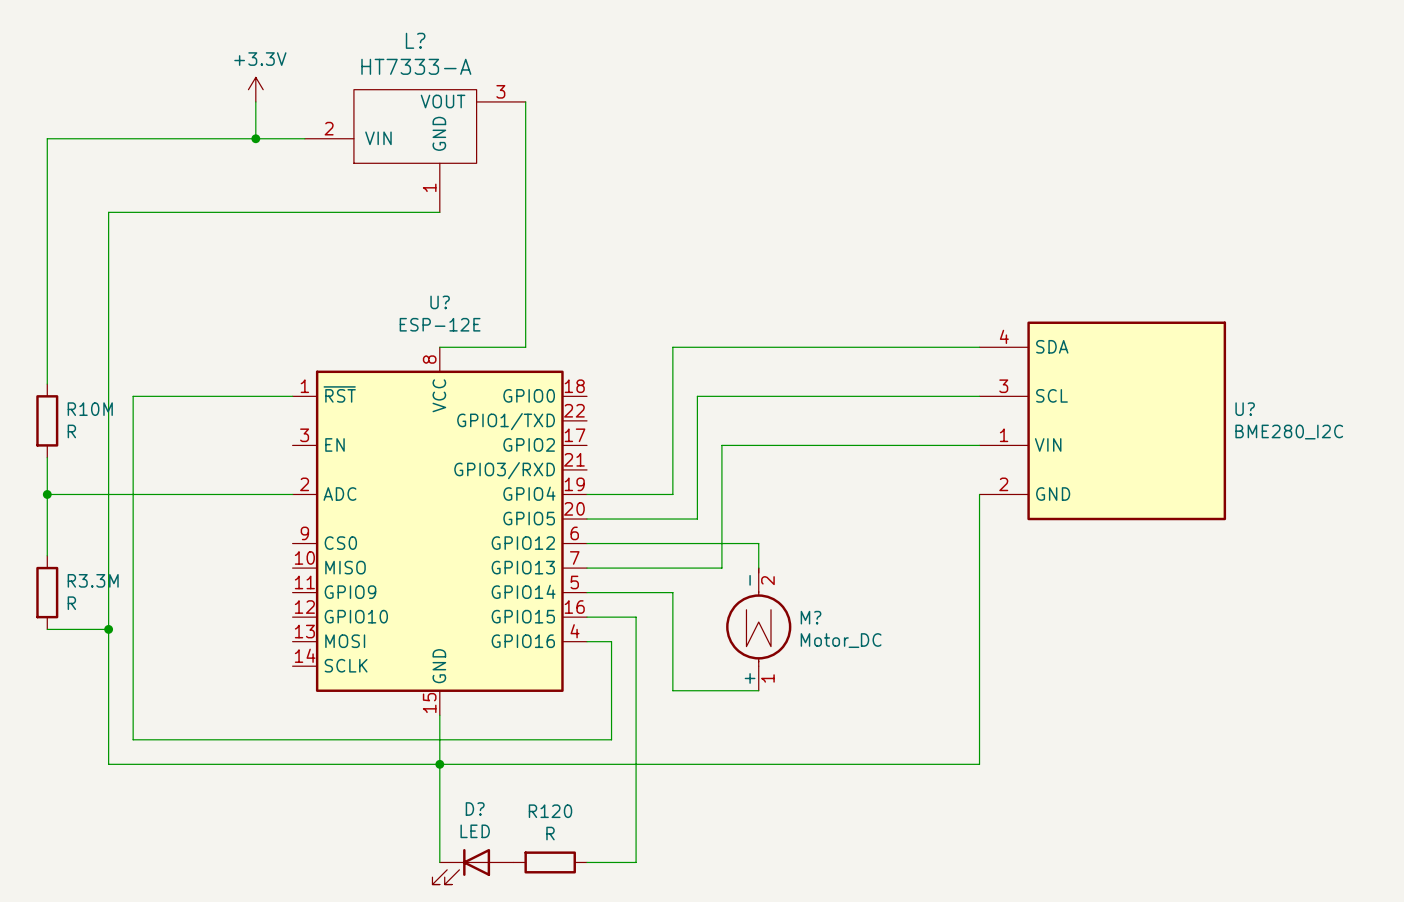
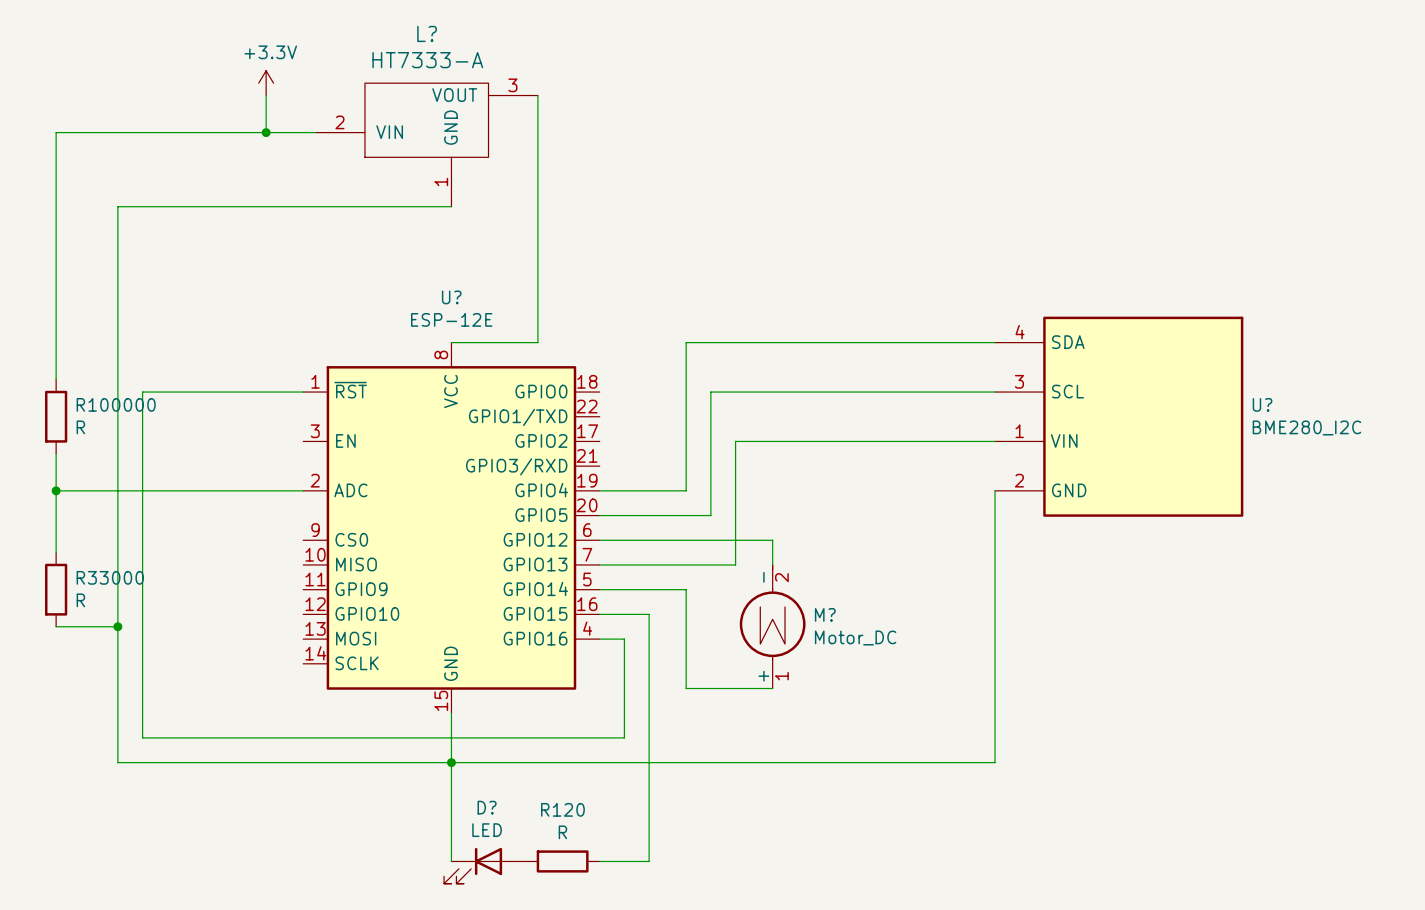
R10M name: R10M (90, 409) -> R100000 (116, 404)
R3.3M name: R3.3M (93, 580) -> R33000 (110, 577)

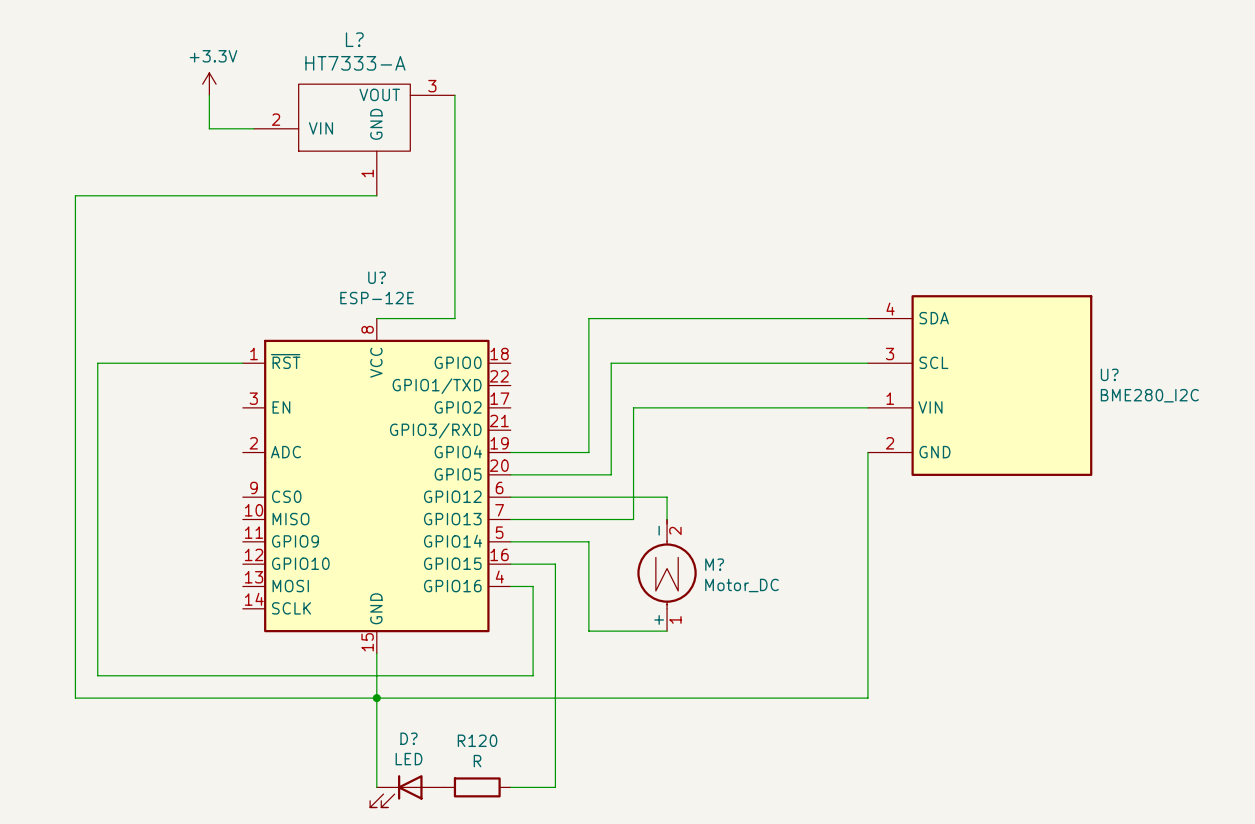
wire: (266, 132) (56, 132) (56, 379) -> none
junction: (266, 132) -> none
R100000: R (56, 416) -> none
wire: (56, 453) (56, 552) -> none
wire: (56, 490) (303, 490) -> none
junction: (56, 490) -> none
R33000: R (56, 589) -> none
wire: (56, 626) (117, 626) -> none
junction: (117, 626) -> none

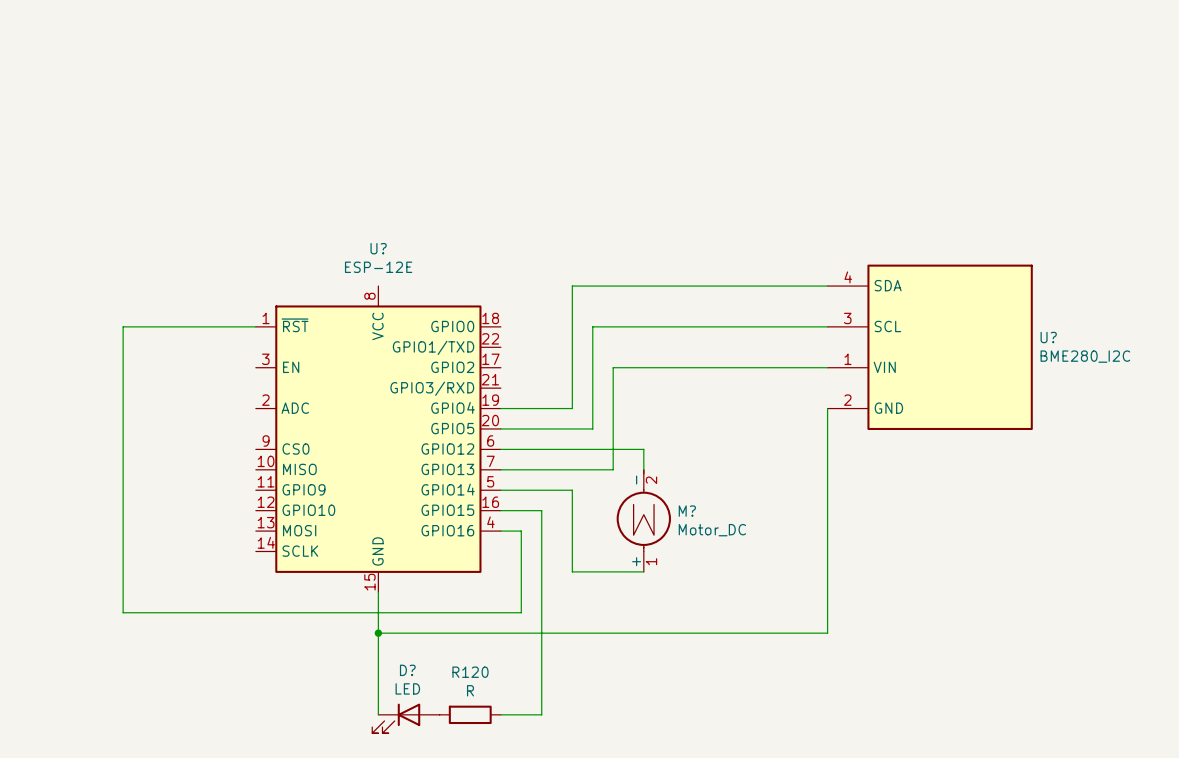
power symbol: +3.3V (209, 84) -> none
wire: (209, 95) (209, 128) (254, 128) -> none
wire: (454, 95) (454, 318) (376, 318) -> none
L?: HT7333-A (354, 139) -> none
wire: (376, 195) (75, 195) (75, 698) (376, 698) -> none

